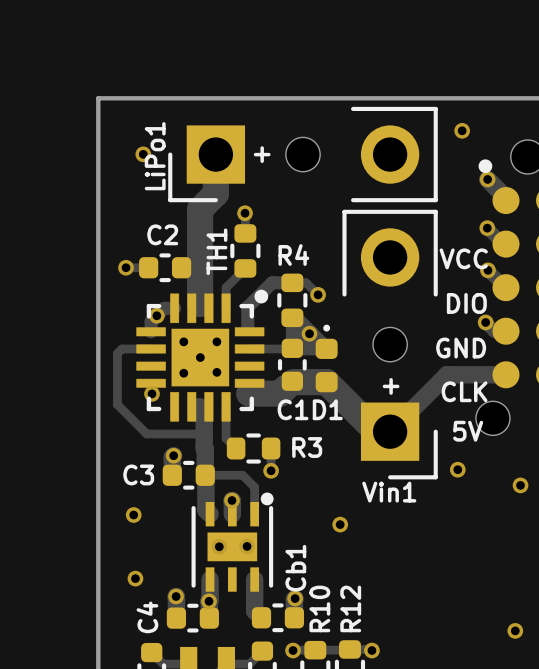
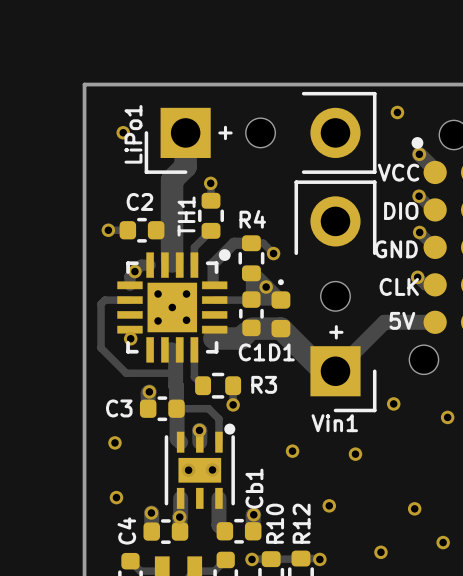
text: none -> VCC (398, 172)
text: VCC (463, 258) -> DIO (401, 210)
text: DIO (466, 303) -> GND (396, 249)
text: GND (461, 348) -> none
text position: CLK (464, 391) -> CLK (399, 286)
text position: 5V (468, 431) -> 5V (402, 320)
via: none -> (355, 454)
via: none -> (329, 505)
via: none -> (414, 508)
via: none -> (380, 552)

